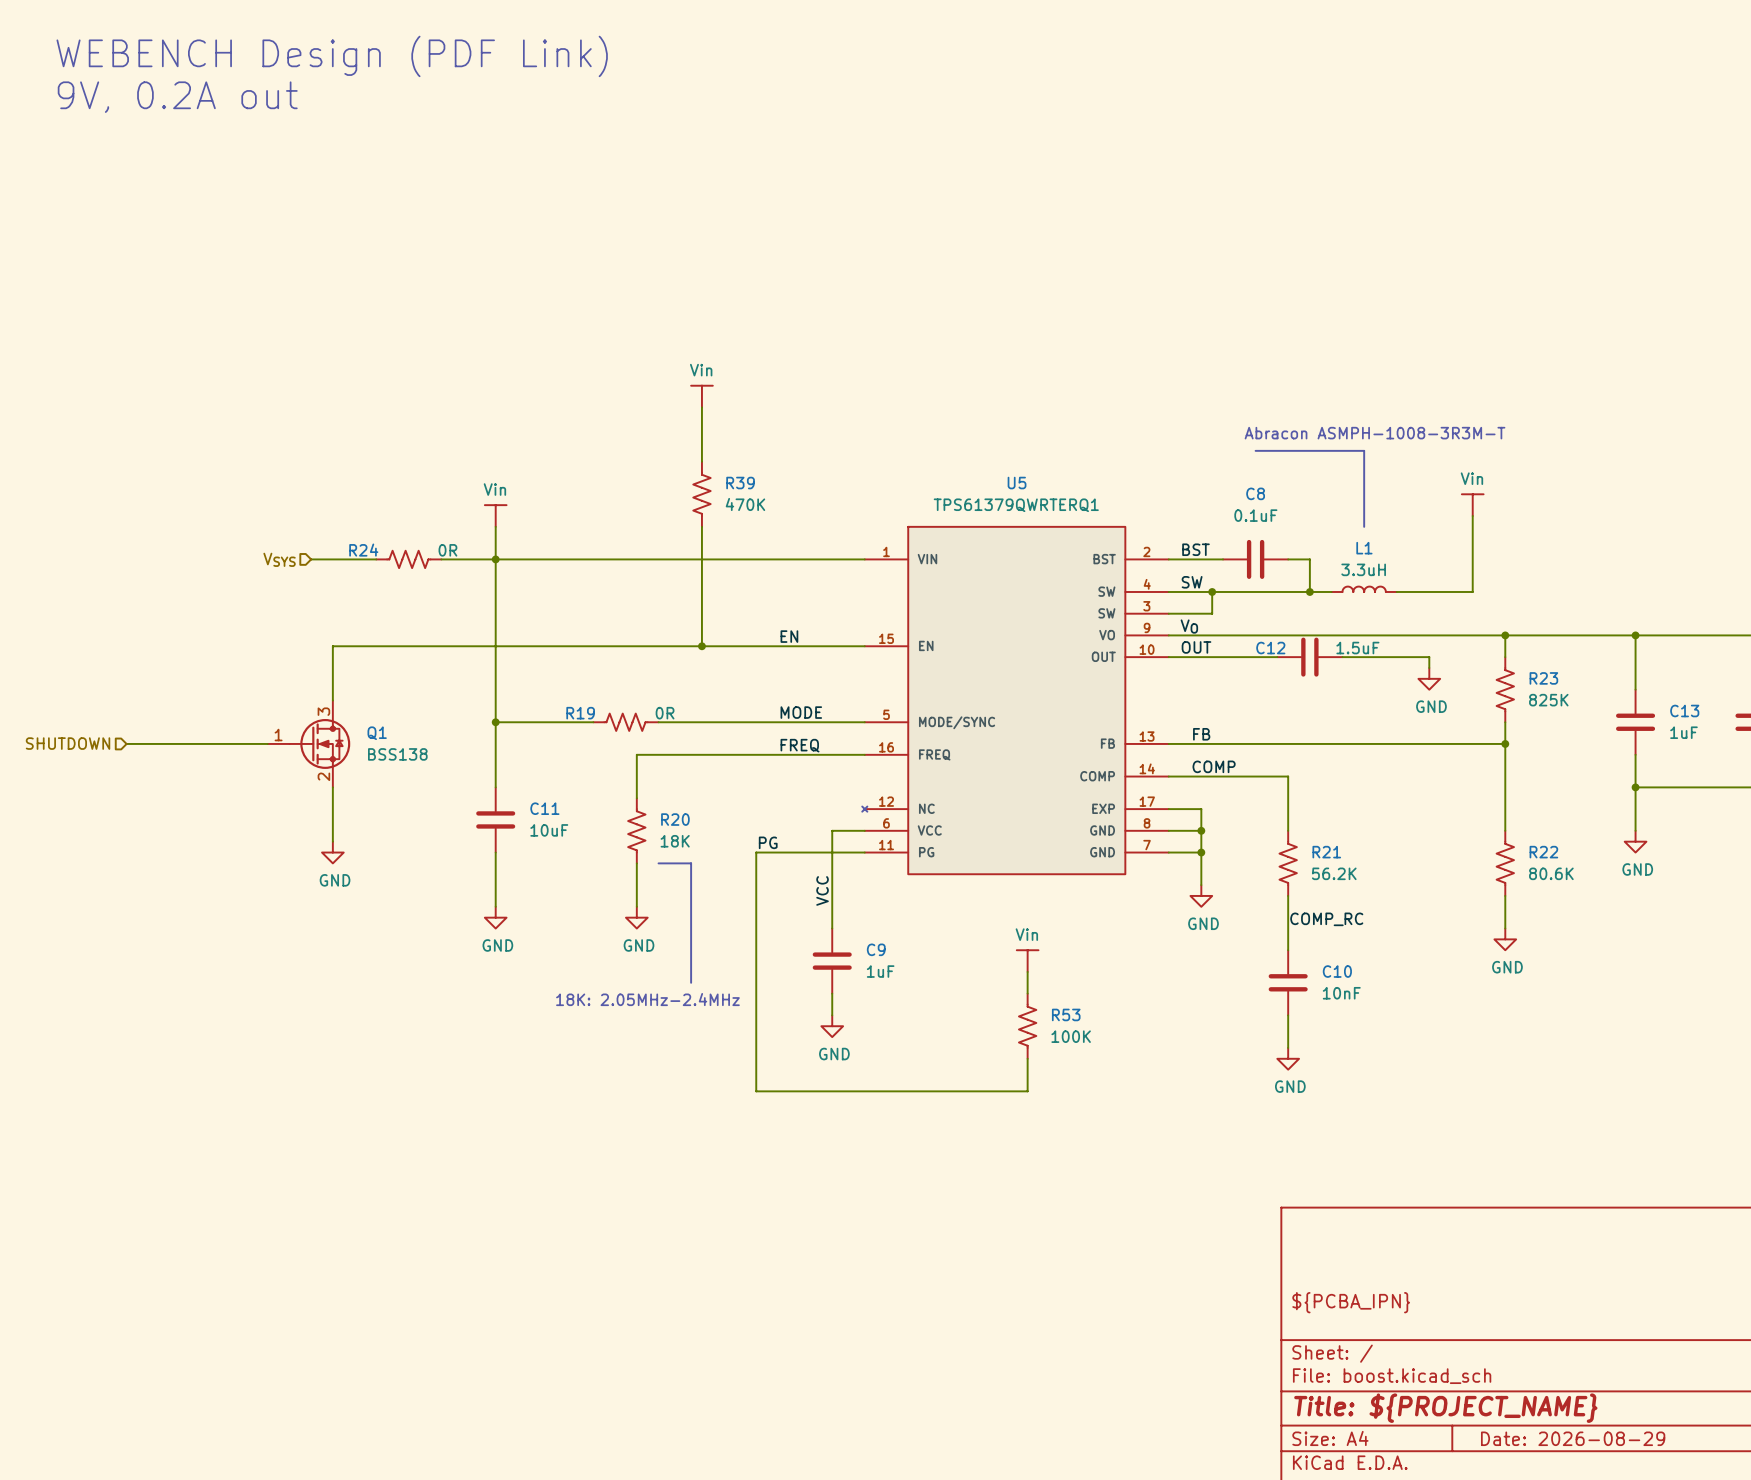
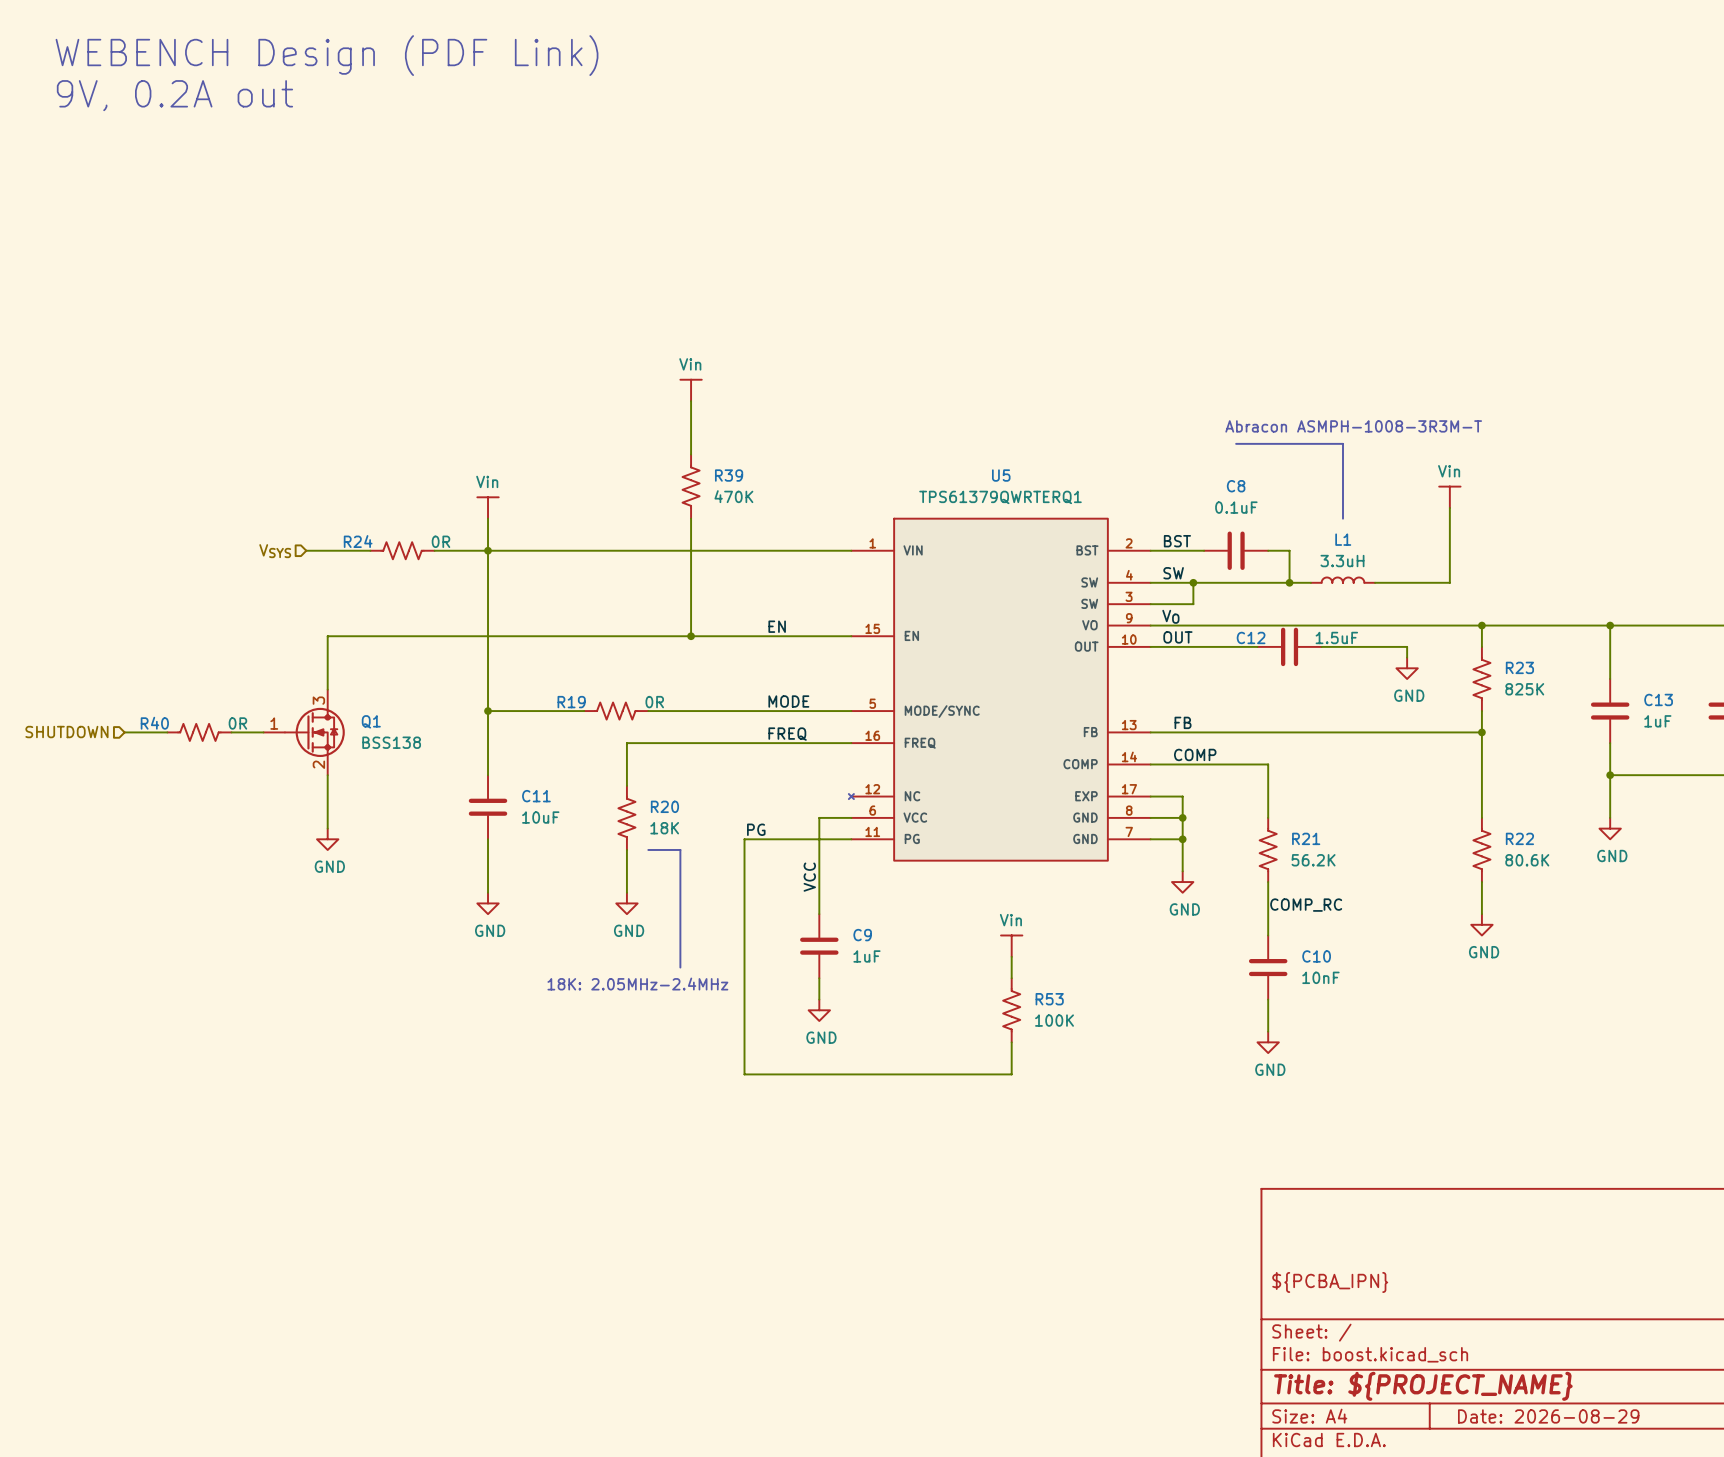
R40: none -> 0R (199, 732)

